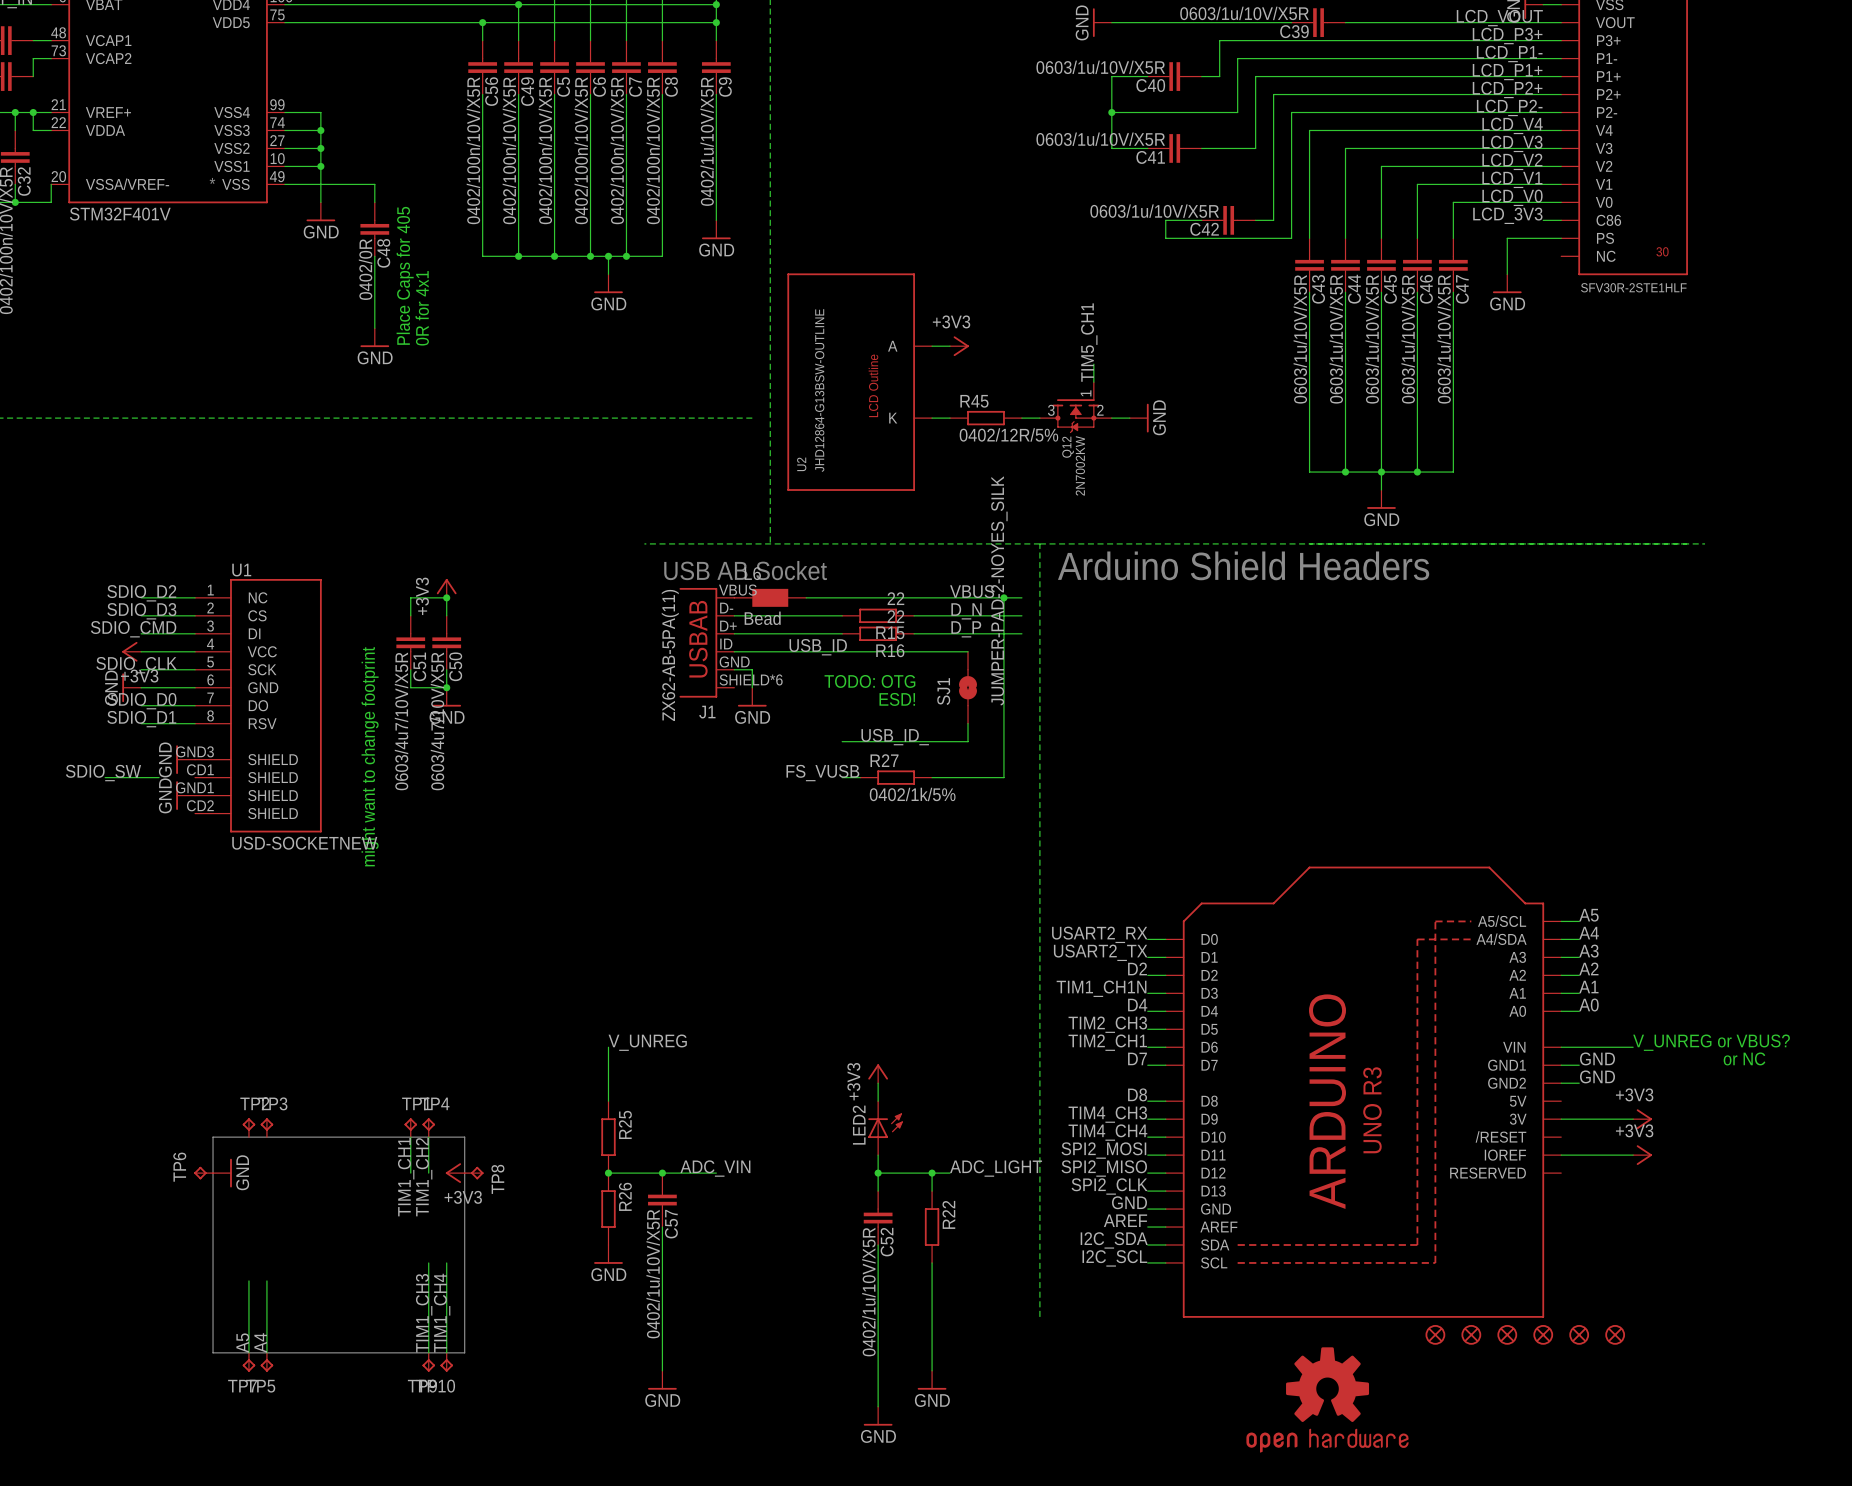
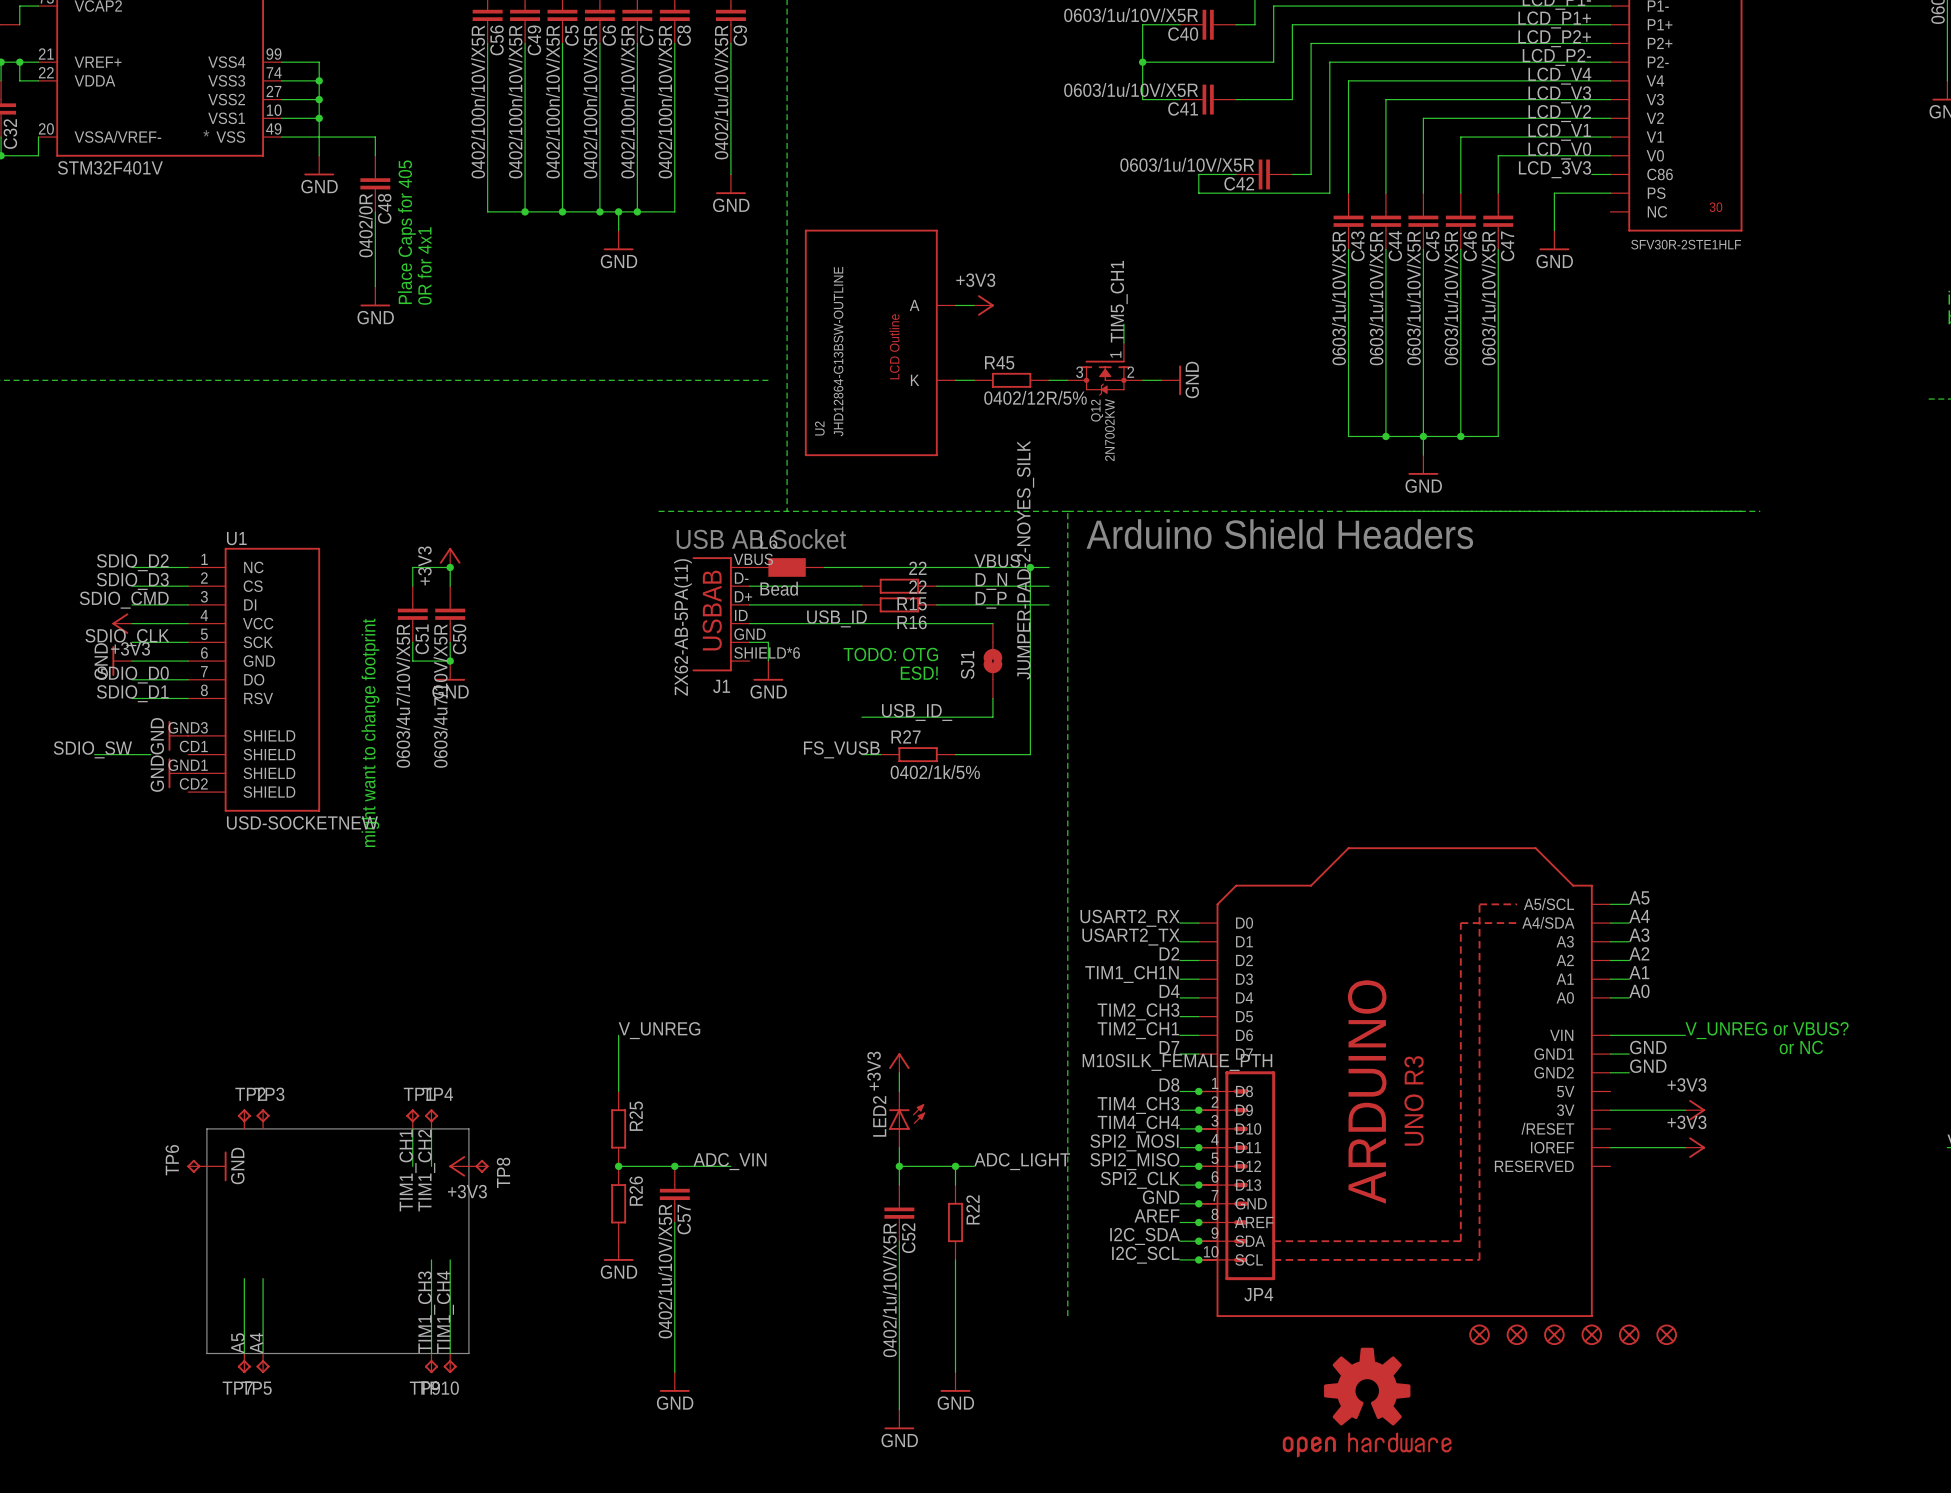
junction: none -> (1198, 1091)
junction: none -> (1198, 1110)
junction: none -> (1198, 1128)
junction: none -> (1198, 1147)
junction: none -> (1198, 1166)
JP4: none -> M10SILK_FEMALE_PTH (1236, 1175)
junction: none -> (1198, 1185)
junction: none -> (1198, 1203)
junction: none -> (1198, 1222)
junction: none -> (1198, 1241)
junction: none -> (1198, 1259)

